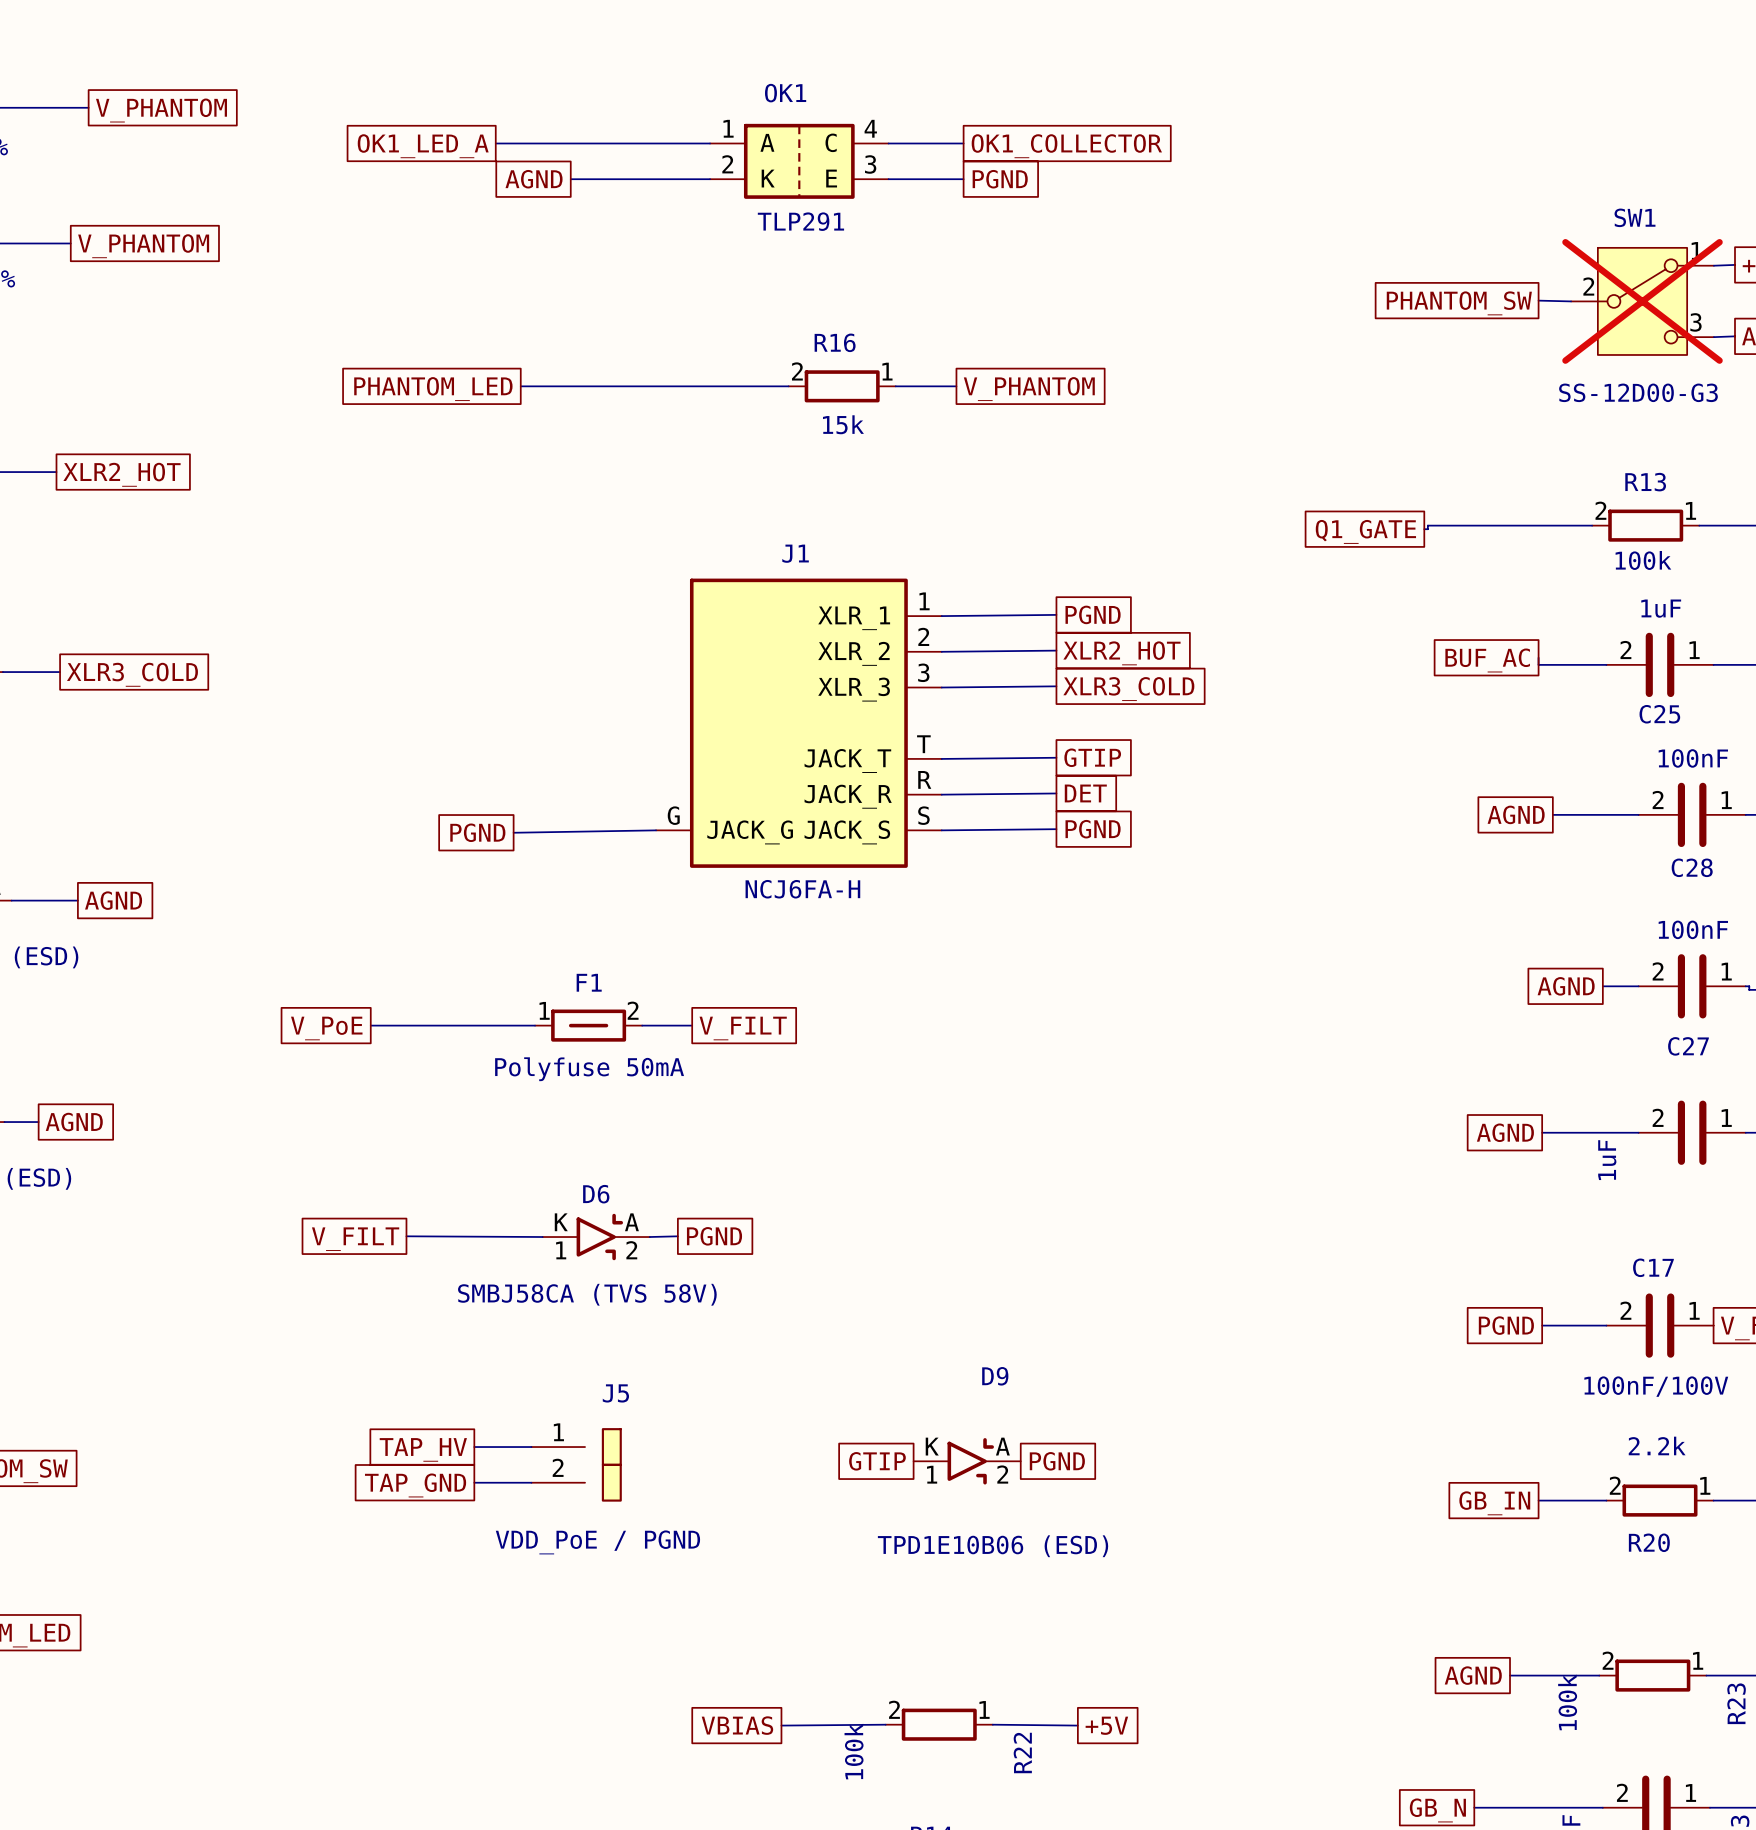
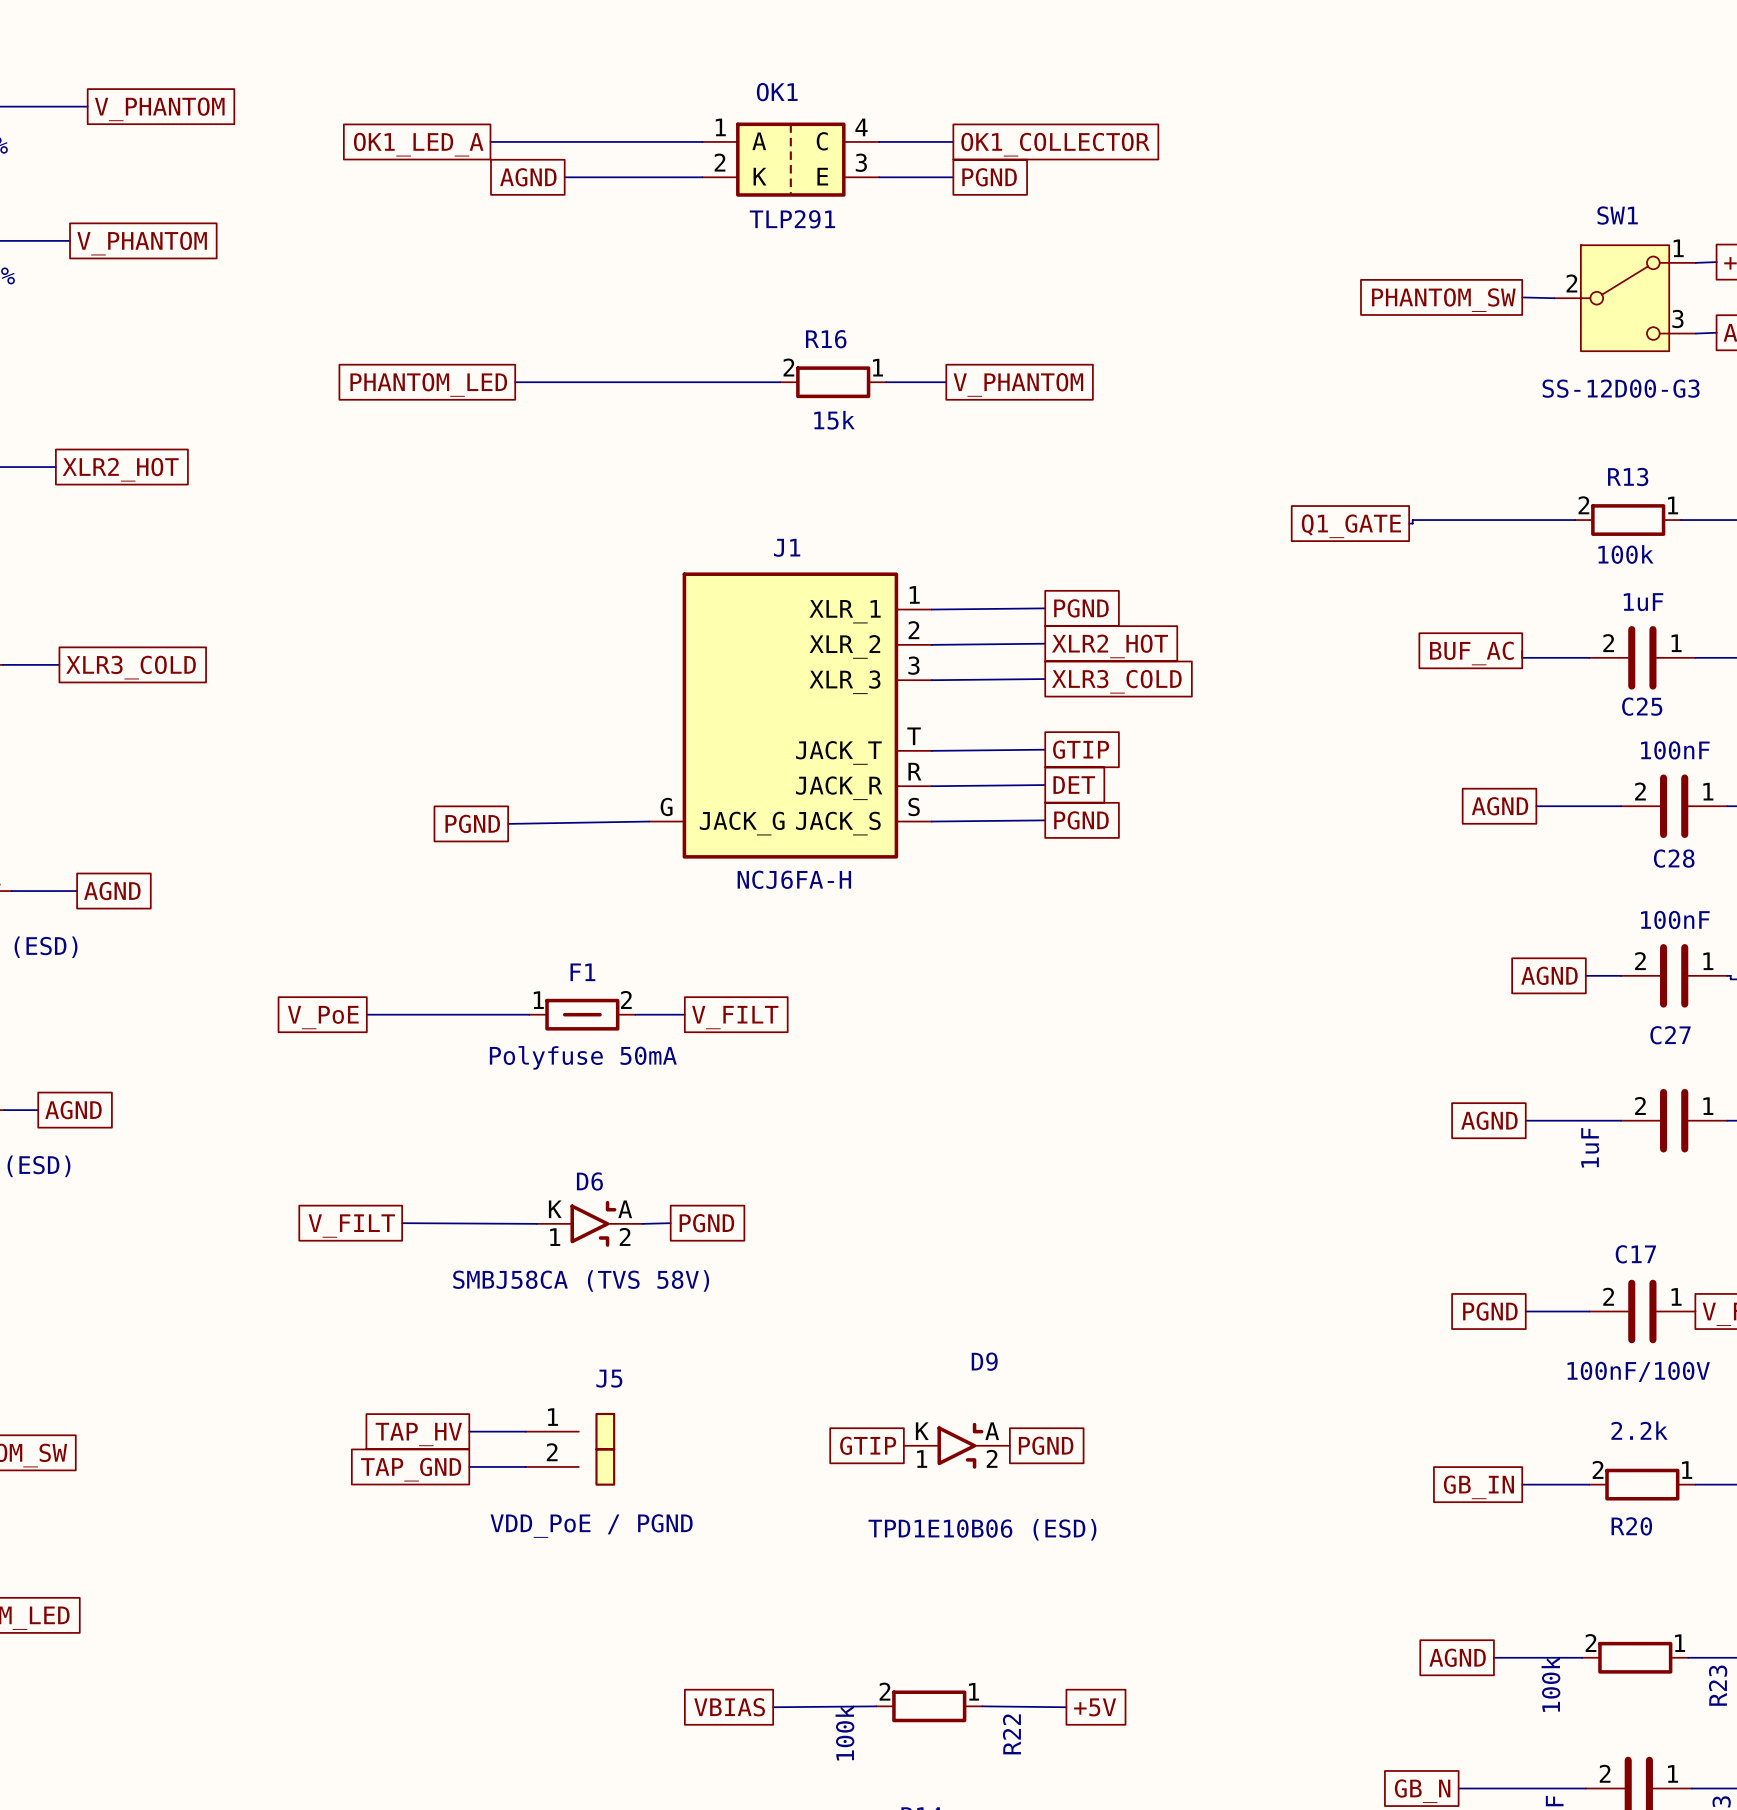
SW1 do-not-place cross: (1642, 301) -> none

